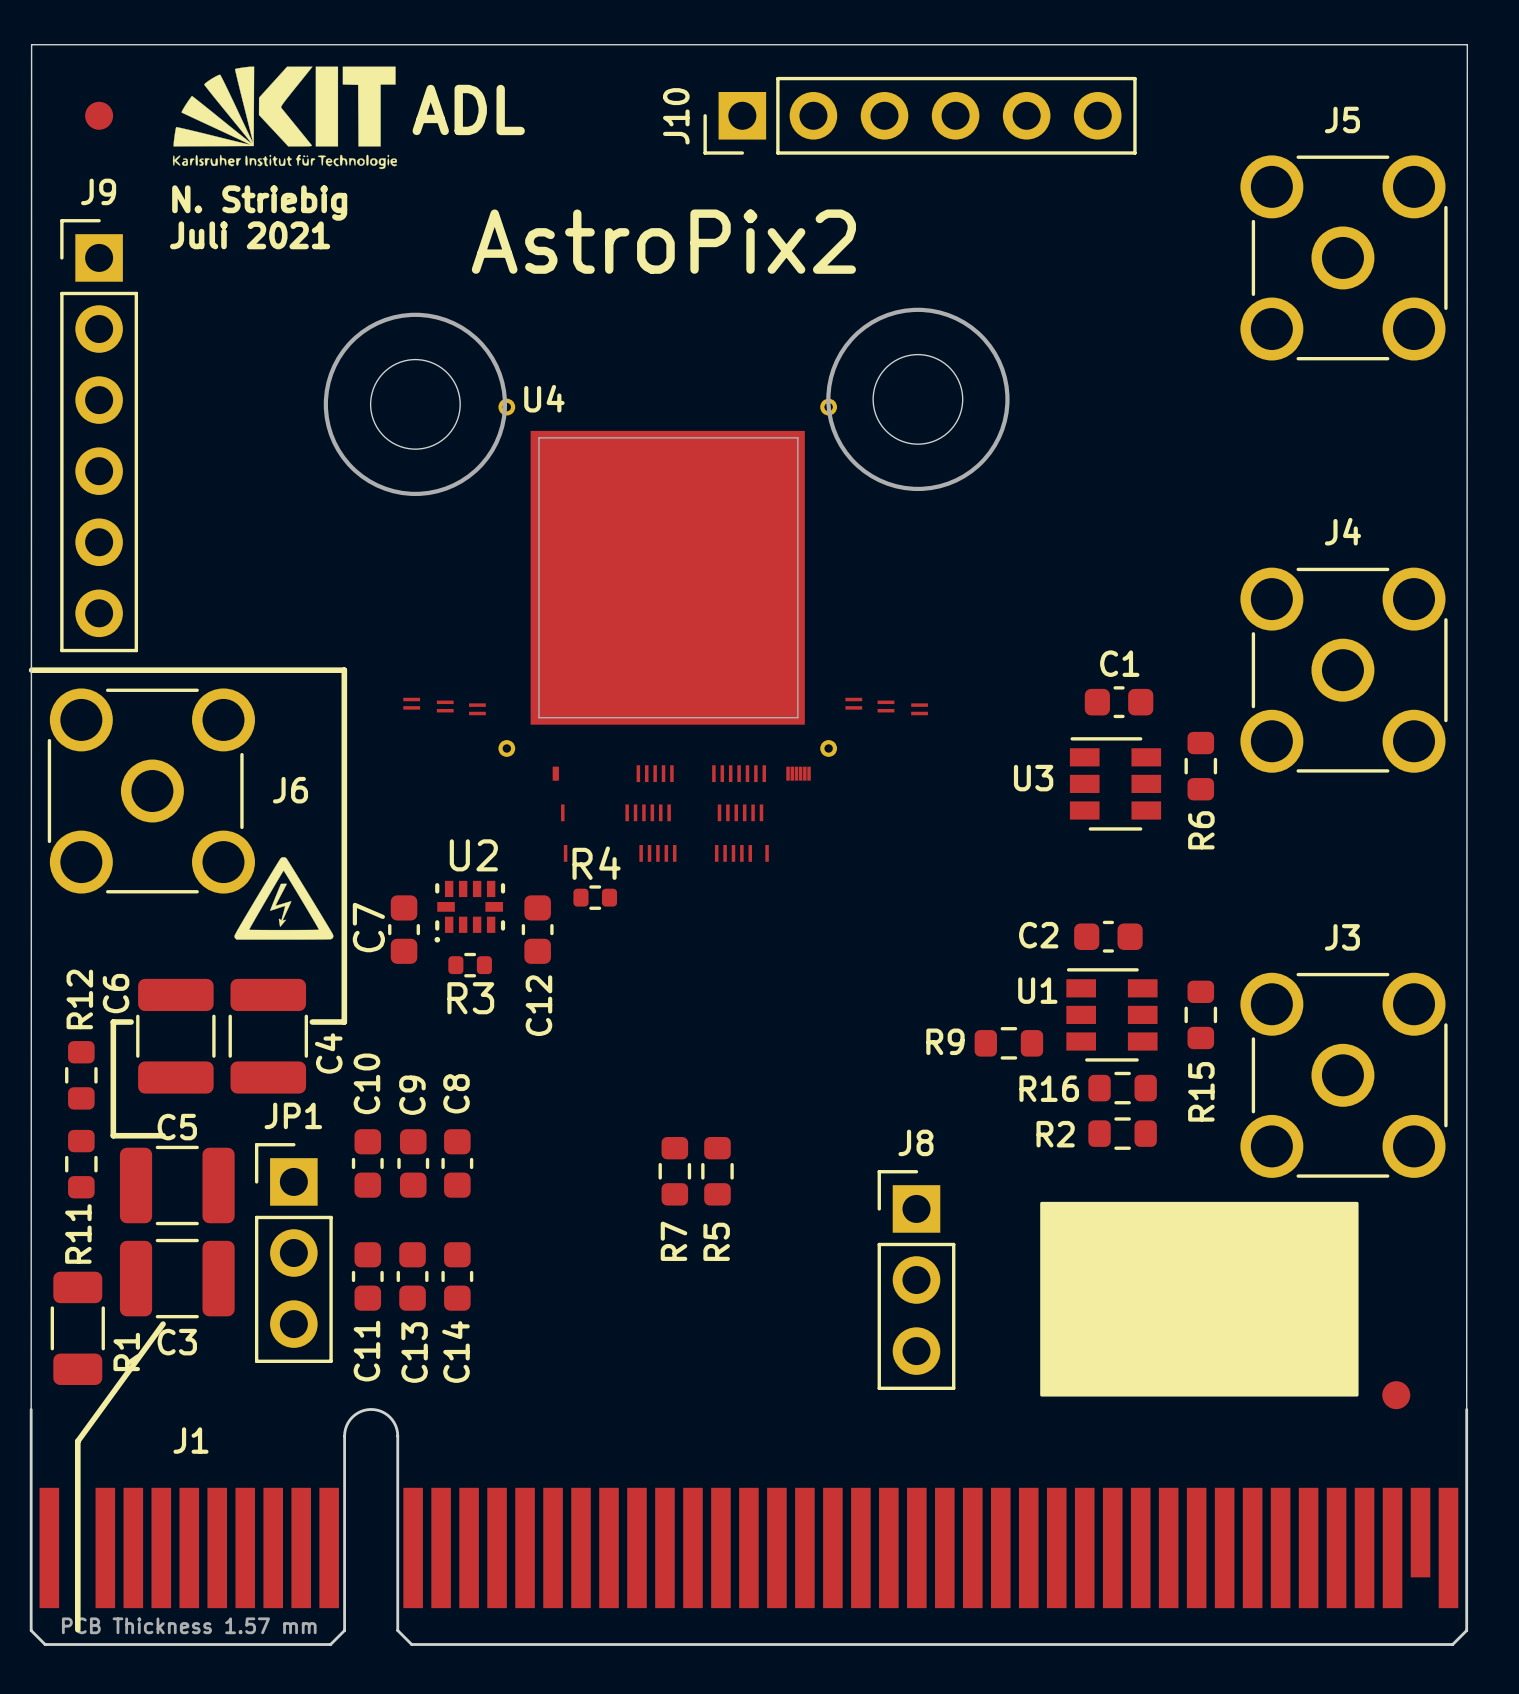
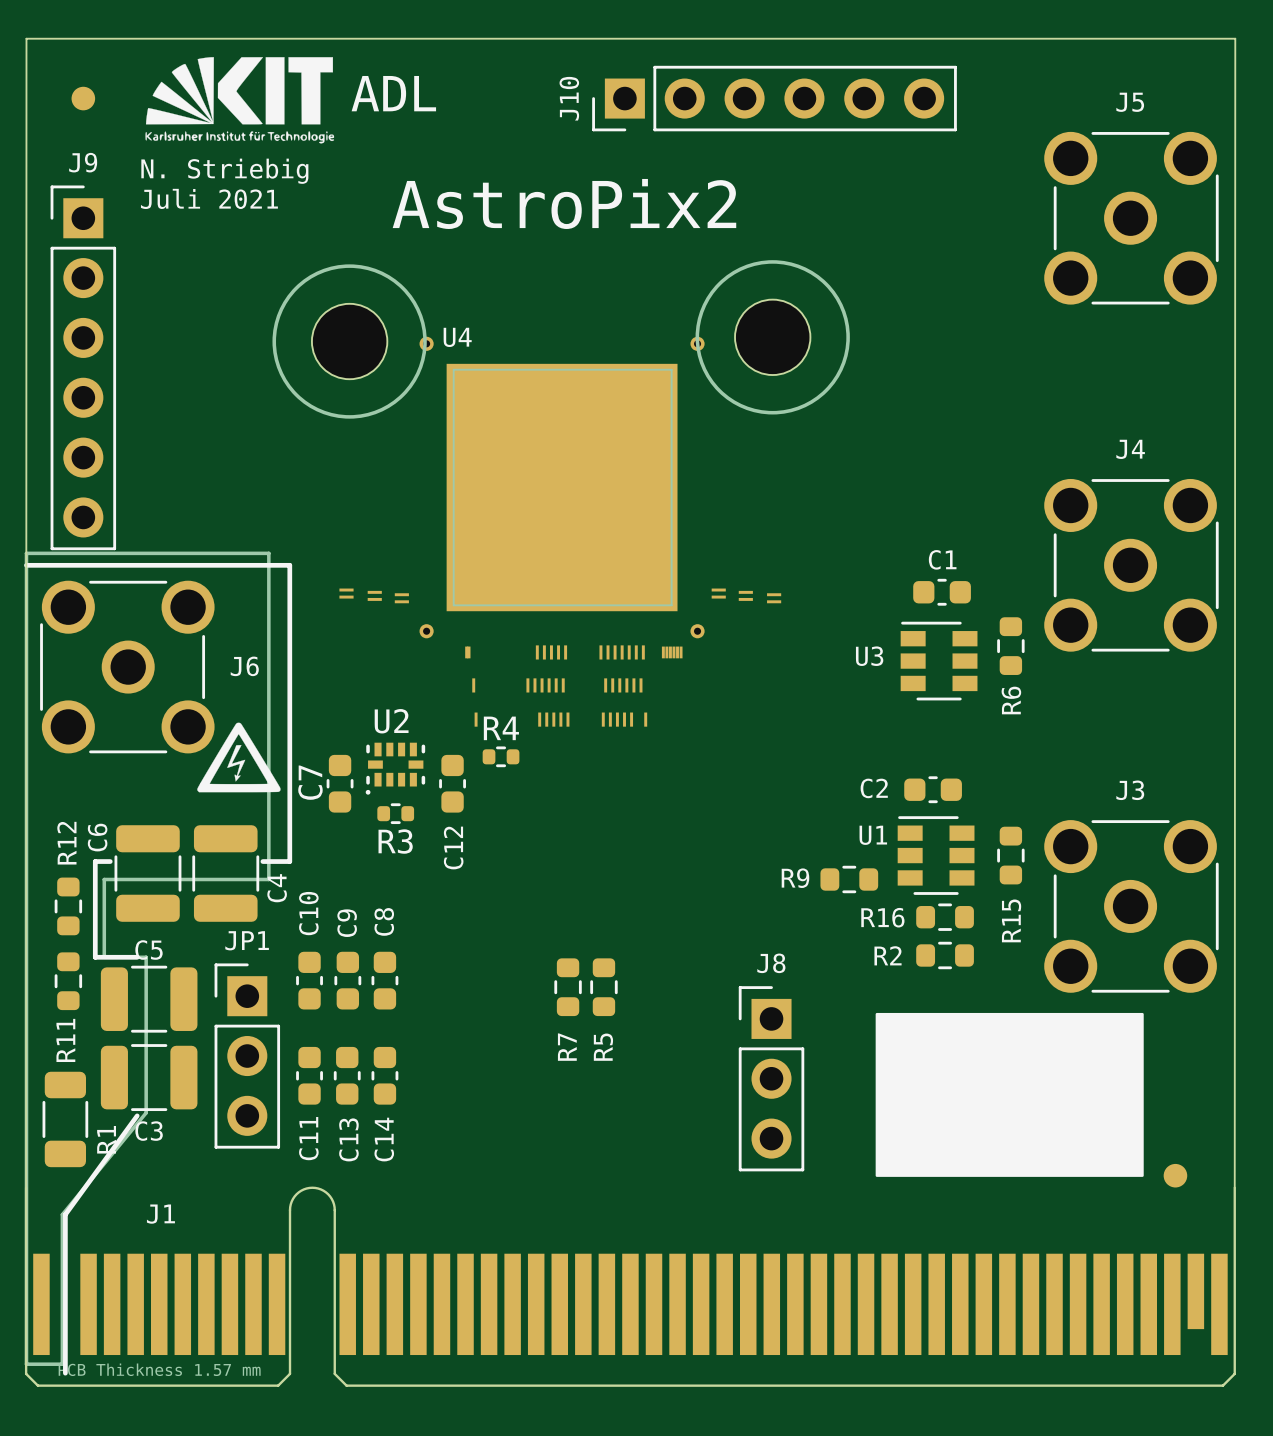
line: none -> (26, 553) (26, 1364) (62, 1364) (62, 1214) (146, 1112) (146, 957) (104, 957) (104, 879) (268, 879) (268, 553) (26, 553)

